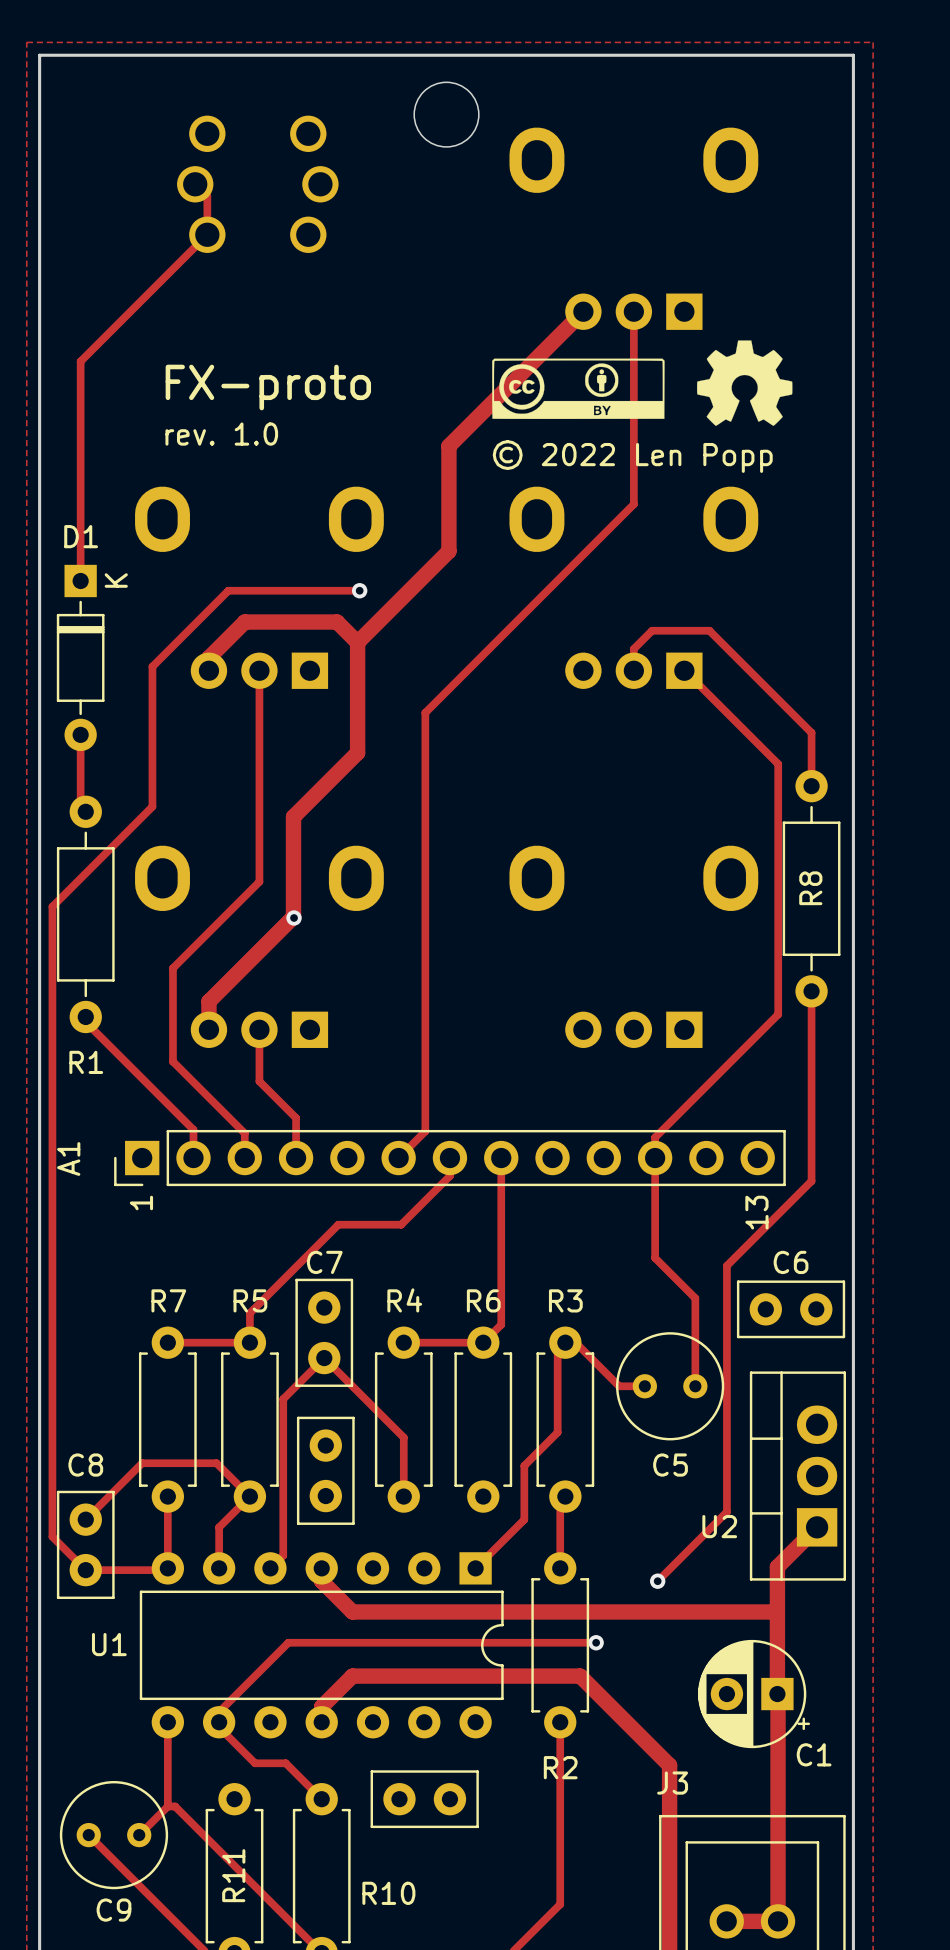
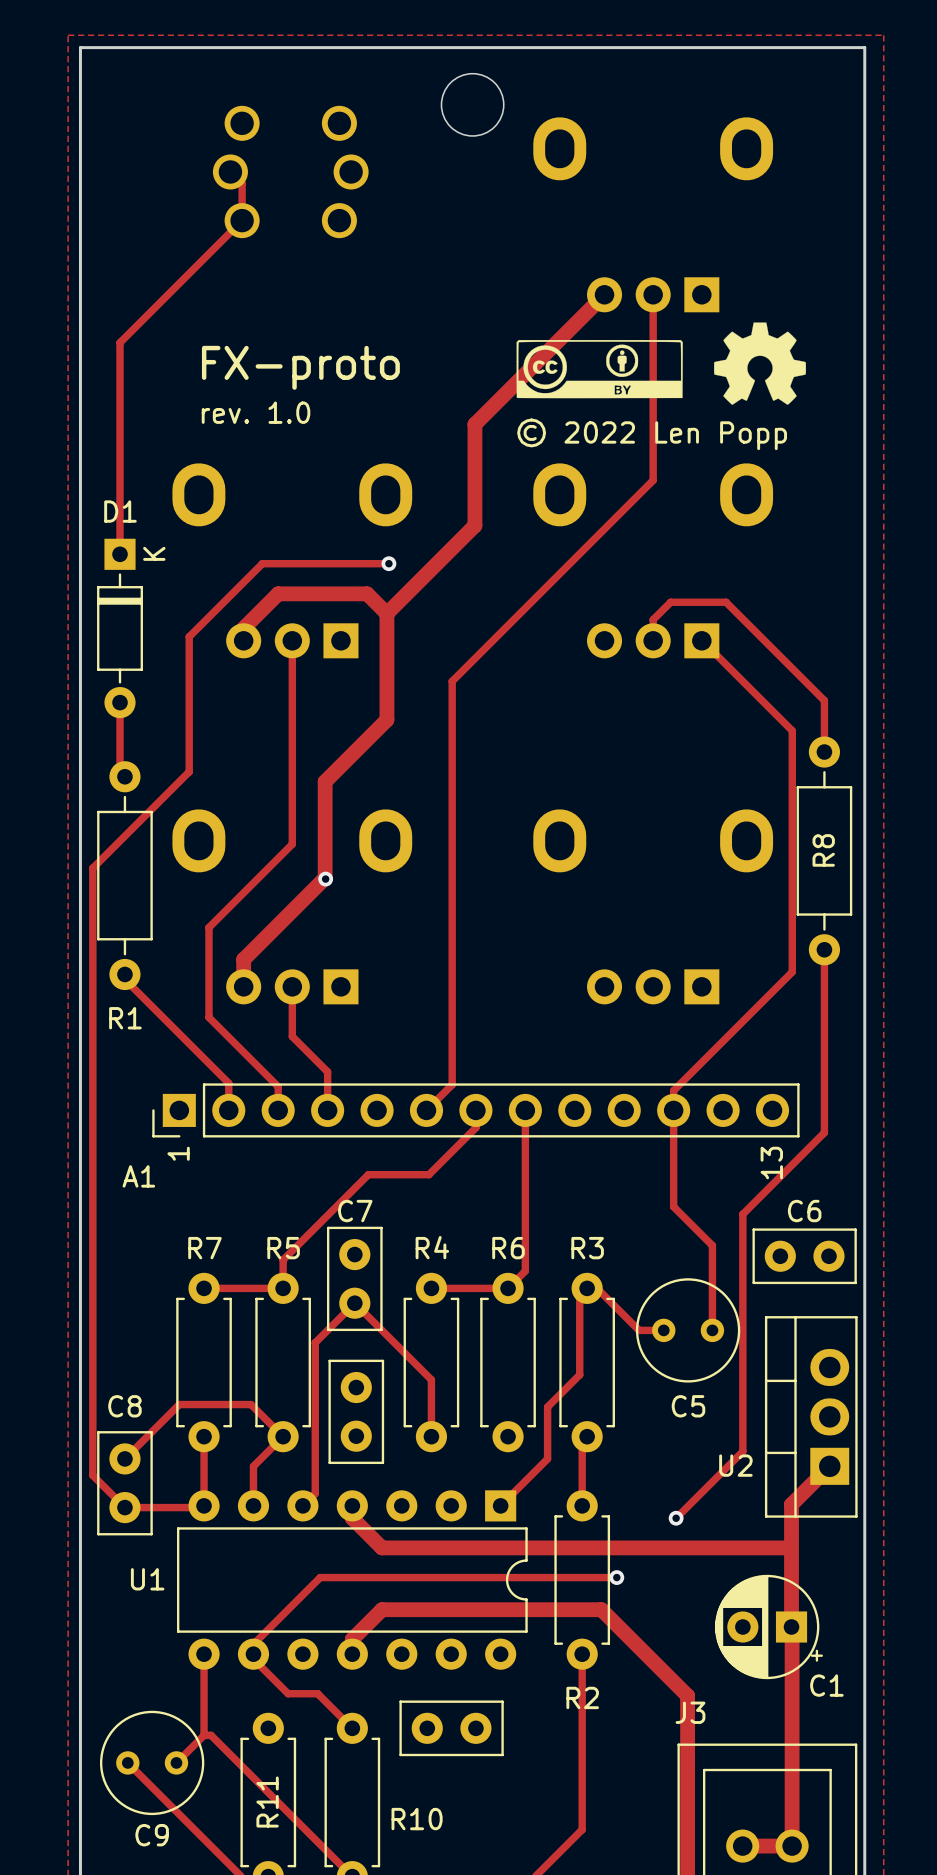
A1 name rotation: 0° (68, 1159) -> 90° clockwise (138, 1176)
A1 name position: A1 (68, 1159) -> A1 (138, 1176)

